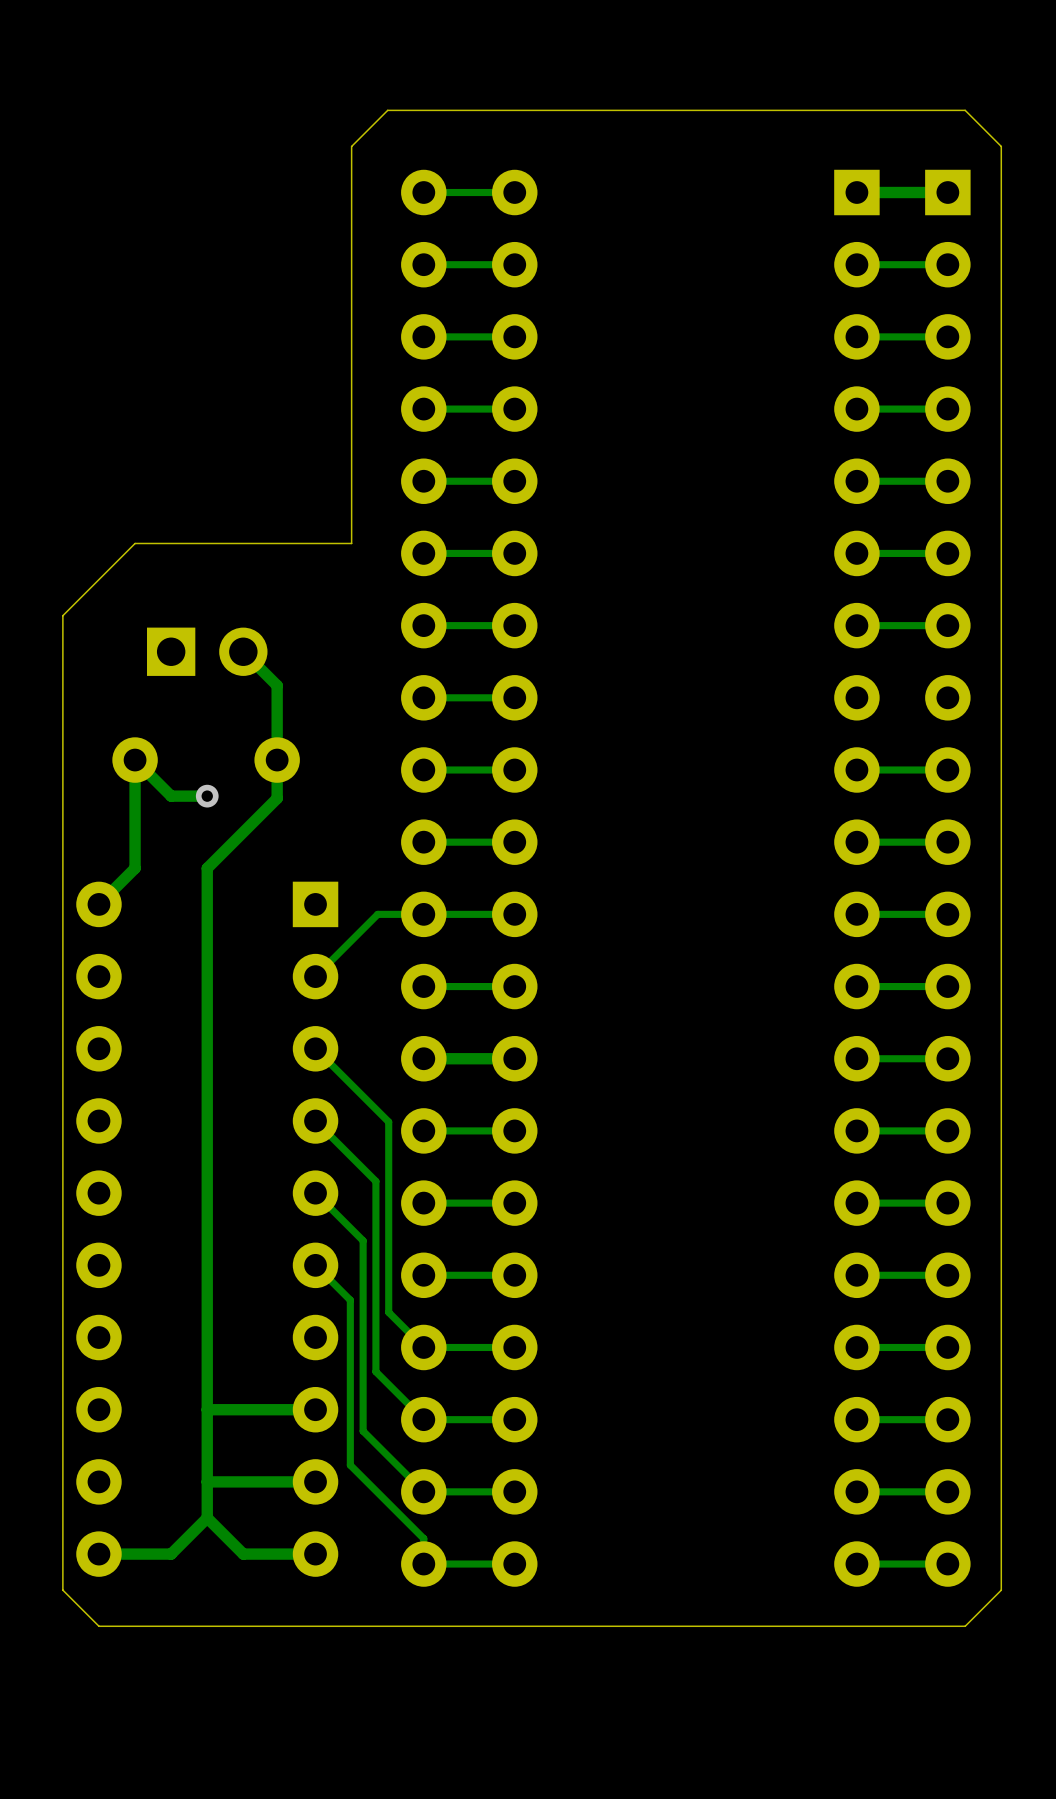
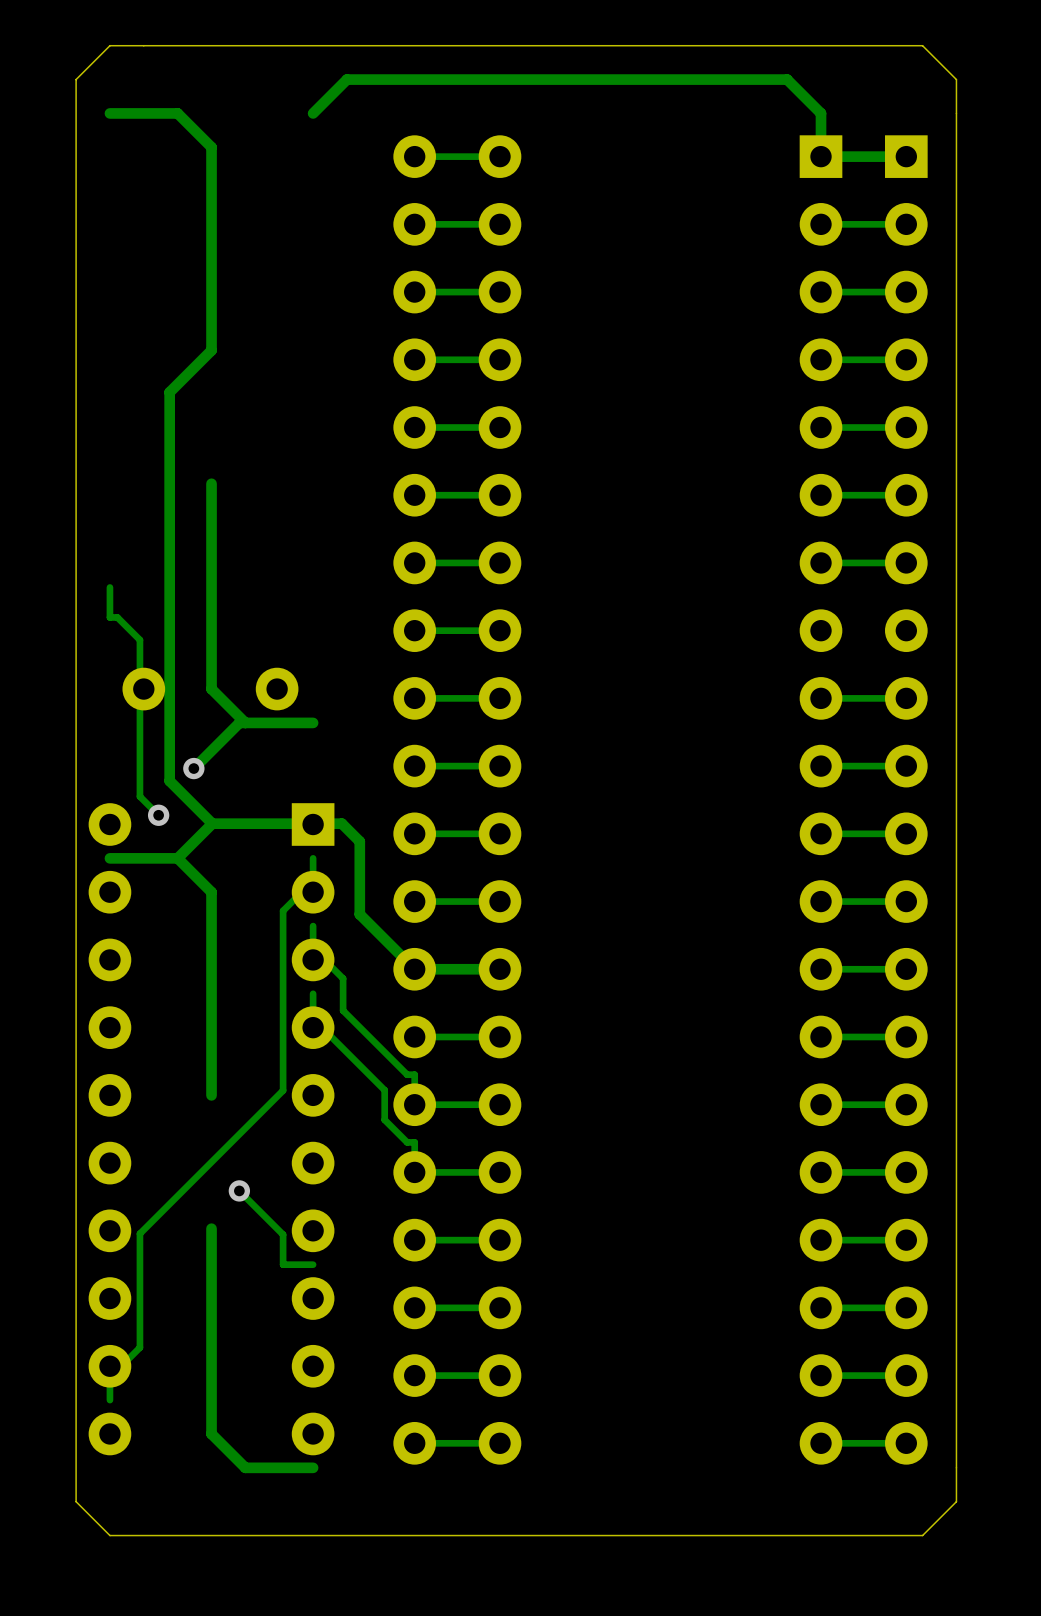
track: none -> (109, 113) (177, 113) (211, 147) (211, 350) (169, 392) (169, 781) (212, 823)
track: none -> (313, 113) (346, 79) (787, 79) (821, 113) (821, 156)
board edge: (1001, 146) (965, 110) (387, 110) (351, 146) (351, 543) (135, 543) (62, 615) -> (956, 113) (956, 79) (922, 45) (109, 45) (76, 79) (76, 553)
track: none -> (211, 483) (211, 689) (245, 722)
track: none -> (109, 587) (109, 617) (117, 617) (139, 639) (139, 796) (158, 815)
part: (207, 651) -> none
track: (243, 651) (277, 685) (277, 798) (207, 868) (207, 976) -> (177, 858) (211, 892)
track: (207, 796) (171, 796) (135, 760) (135, 868) (98, 904) -> none
via position: (207, 796) -> (193, 768)
track: none -> (313, 722) (239, 722) (193, 768)
via: none -> (158, 815)
track: none -> (212, 823) (341, 823) (359, 841) (359, 914) (414, 969)
track: none -> (212, 823) (177, 858)
track: (423, 914) (377, 914) (315, 976) -> none
track: none -> (177, 858) (109, 858)
track: none -> (313, 858) (313, 888) (305, 888) (283, 910) (283, 1090) (139, 1233) (139, 1347) (117, 1370) (109, 1370) (109, 1400)
track: none -> (313, 926) (313, 956) (320, 956) (343, 978) (343, 1010) (407, 1074) (414, 1074) (414, 1104)
track: (315, 1048) (388, 1121) (388, 1312) (423, 1347) -> none
track: none -> (313, 993) (313, 1023) (318, 1023) (384, 1090) (384, 1119) (407, 1142) (414, 1142) (414, 1172)
track: (315, 1120) (375, 1181) (375, 1371) (423, 1419) -> none
track: (207, 1193) (207, 1335) -> none
track: (315, 1193) (363, 1240) (363, 1431) (423, 1491) -> none
track: (315, 1265) (350, 1300) (350, 1465) (423, 1538) (423, 1564) -> none
track: none -> (239, 1190) (283, 1234) (283, 1264) (313, 1264)
via: none -> (239, 1190)
track: (315, 1409) (207, 1409) -> none
track: (315, 1481) (207, 1481) -> none
track: none -> (211, 1400) (211, 1433) (245, 1467) (313, 1467)
track: (315, 1554) (243, 1554) (207, 1517) (171, 1554) (98, 1554) -> none
board edge: (1001, 1590) (965, 1626) (98, 1626) (62, 1590) -> (956, 1467) (956, 1501) (922, 1535) (109, 1535) (76, 1501) (76, 1467)

